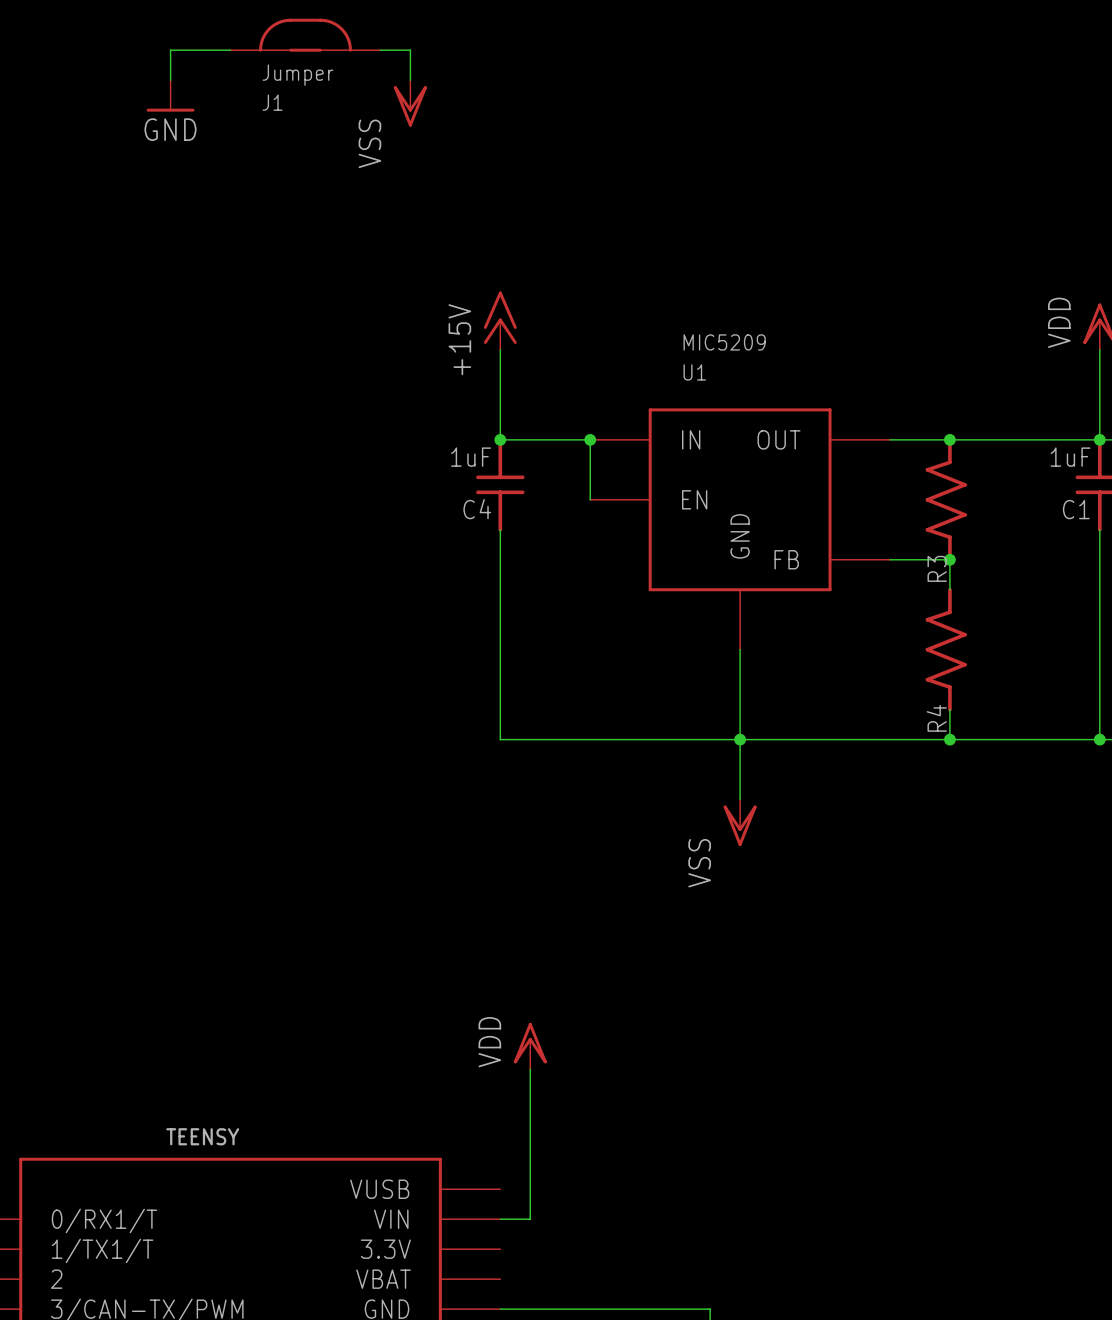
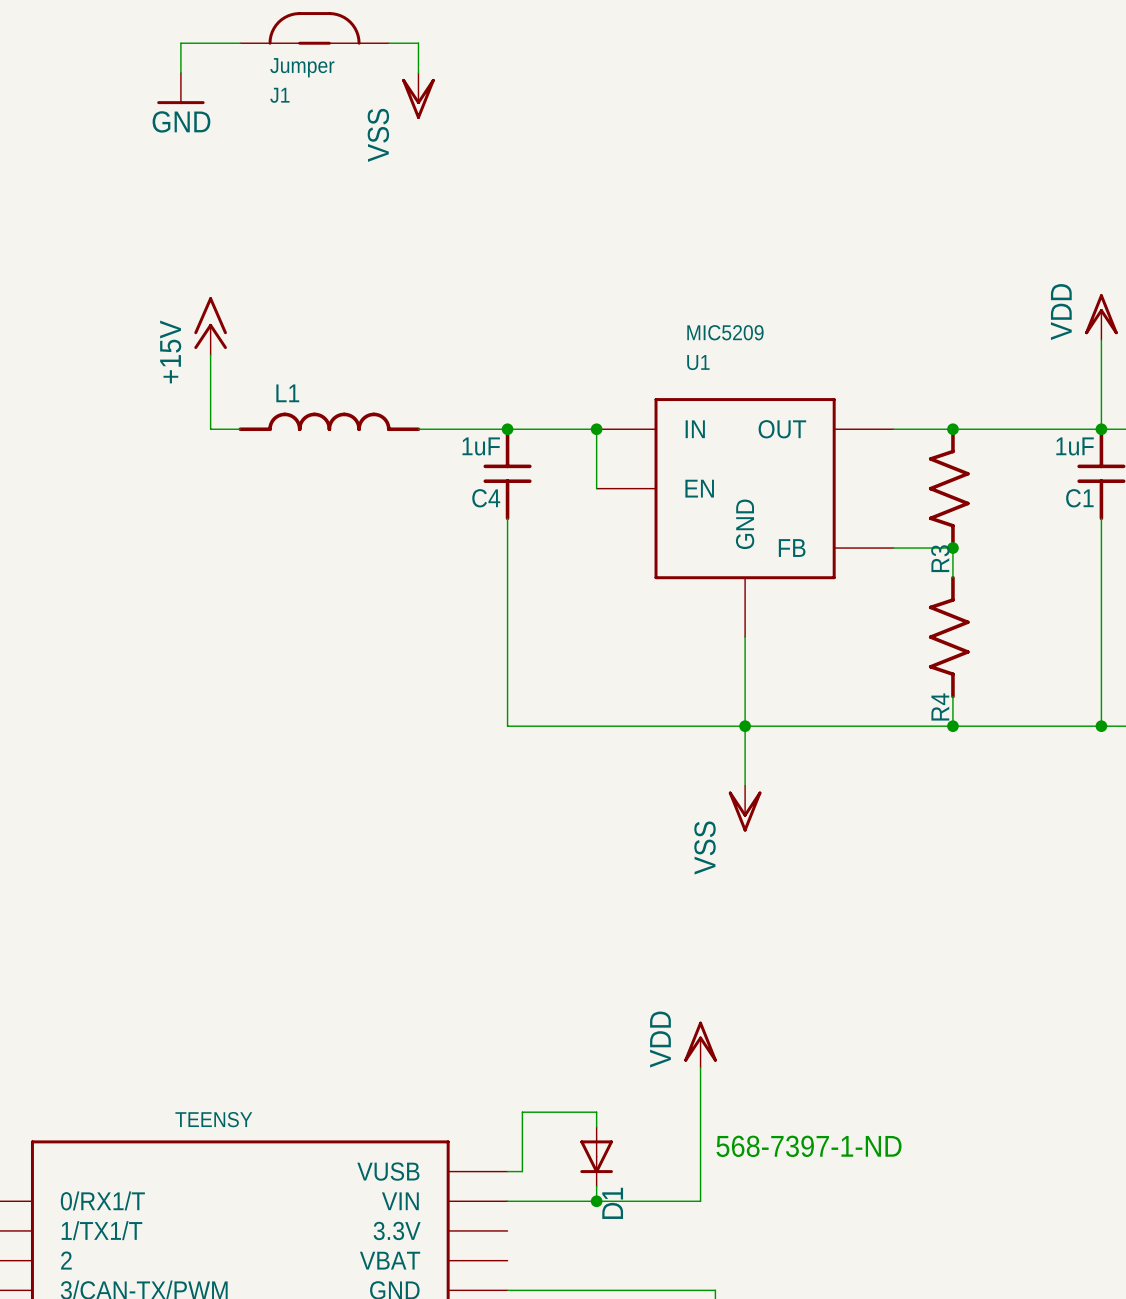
power symbol: +15V (500, 320) -> none
power symbol: none -> +15V (210, 326)
wire: (500, 349) (500, 439) -> (418, 429) (507, 429)
wire: none -> (210, 355) (210, 429) (240, 429)
L1: none -> (329, 421)
power symbol position: VDD (530, 1046) -> VDD (700, 1044)
wire: (530, 1069) (530, 1219) -> (700, 1067) (700, 1201) (537, 1201)
wire: none -> (596, 1127) (596, 1112) (522, 1112) (522, 1171) (507, 1171)
text: none -> 568-7397-1-ND (809, 1146)
D1: none -> (596, 1156)
wire: none -> (596, 1186) (596, 1201)
junction: none -> (596, 1201)

